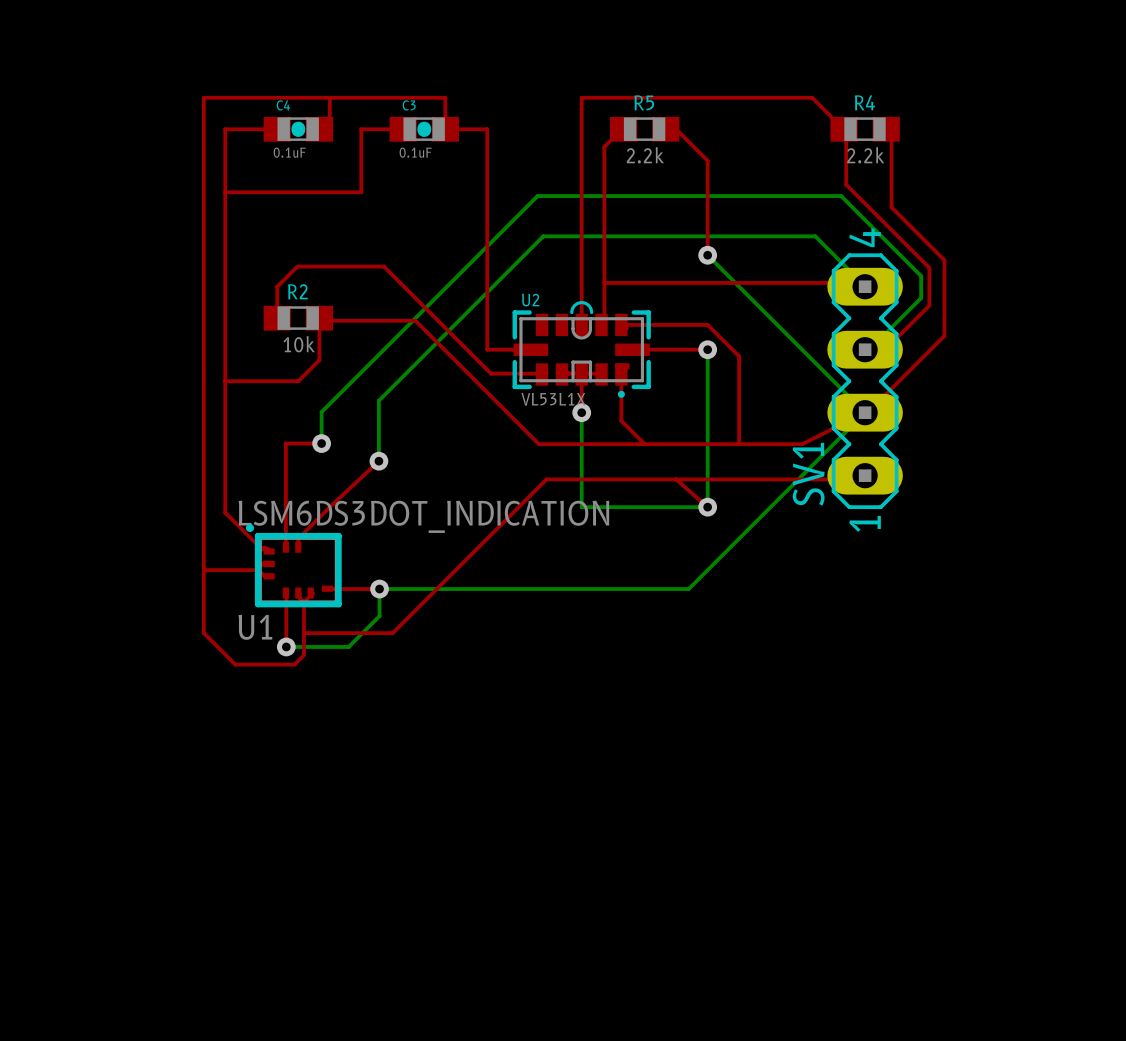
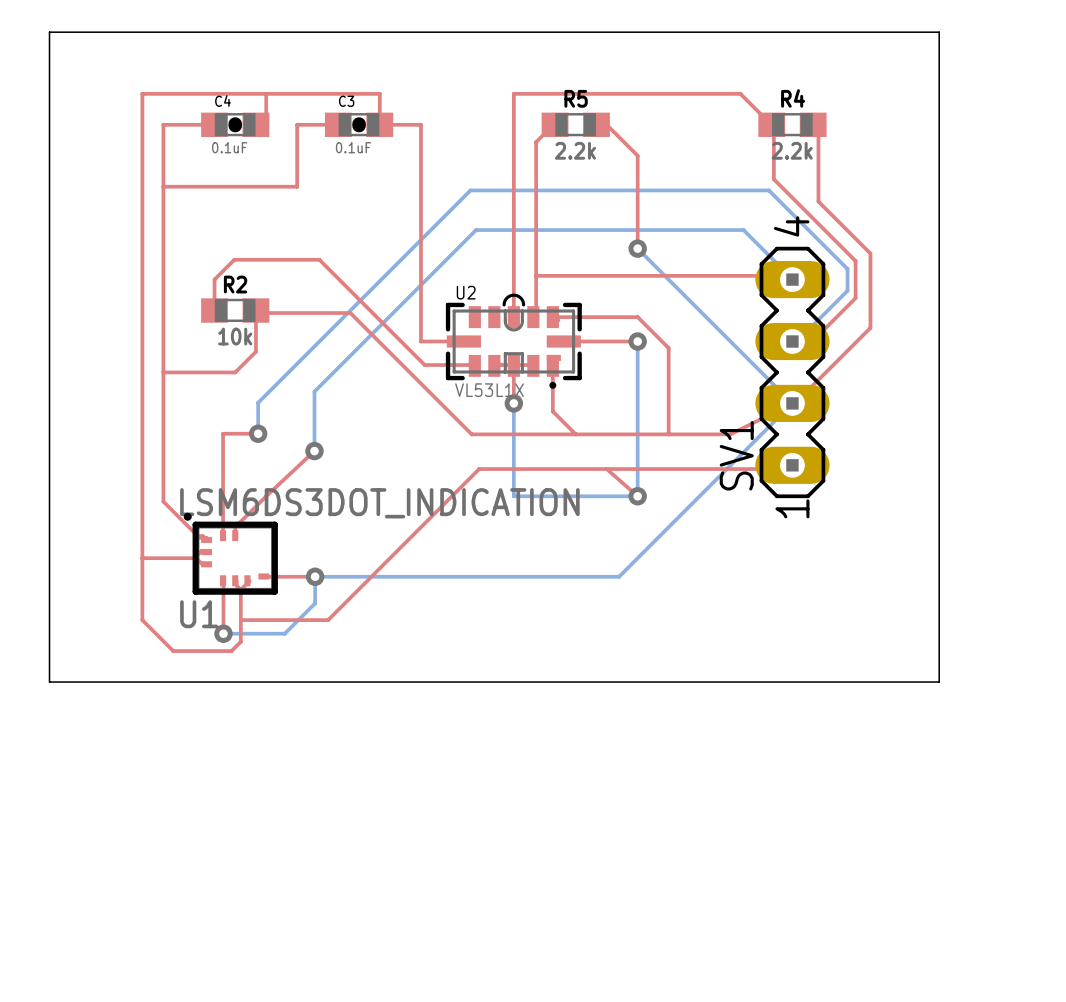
board edge: none -> (49, 32) (939, 32) (939, 682) (49, 682) (49, 32)

